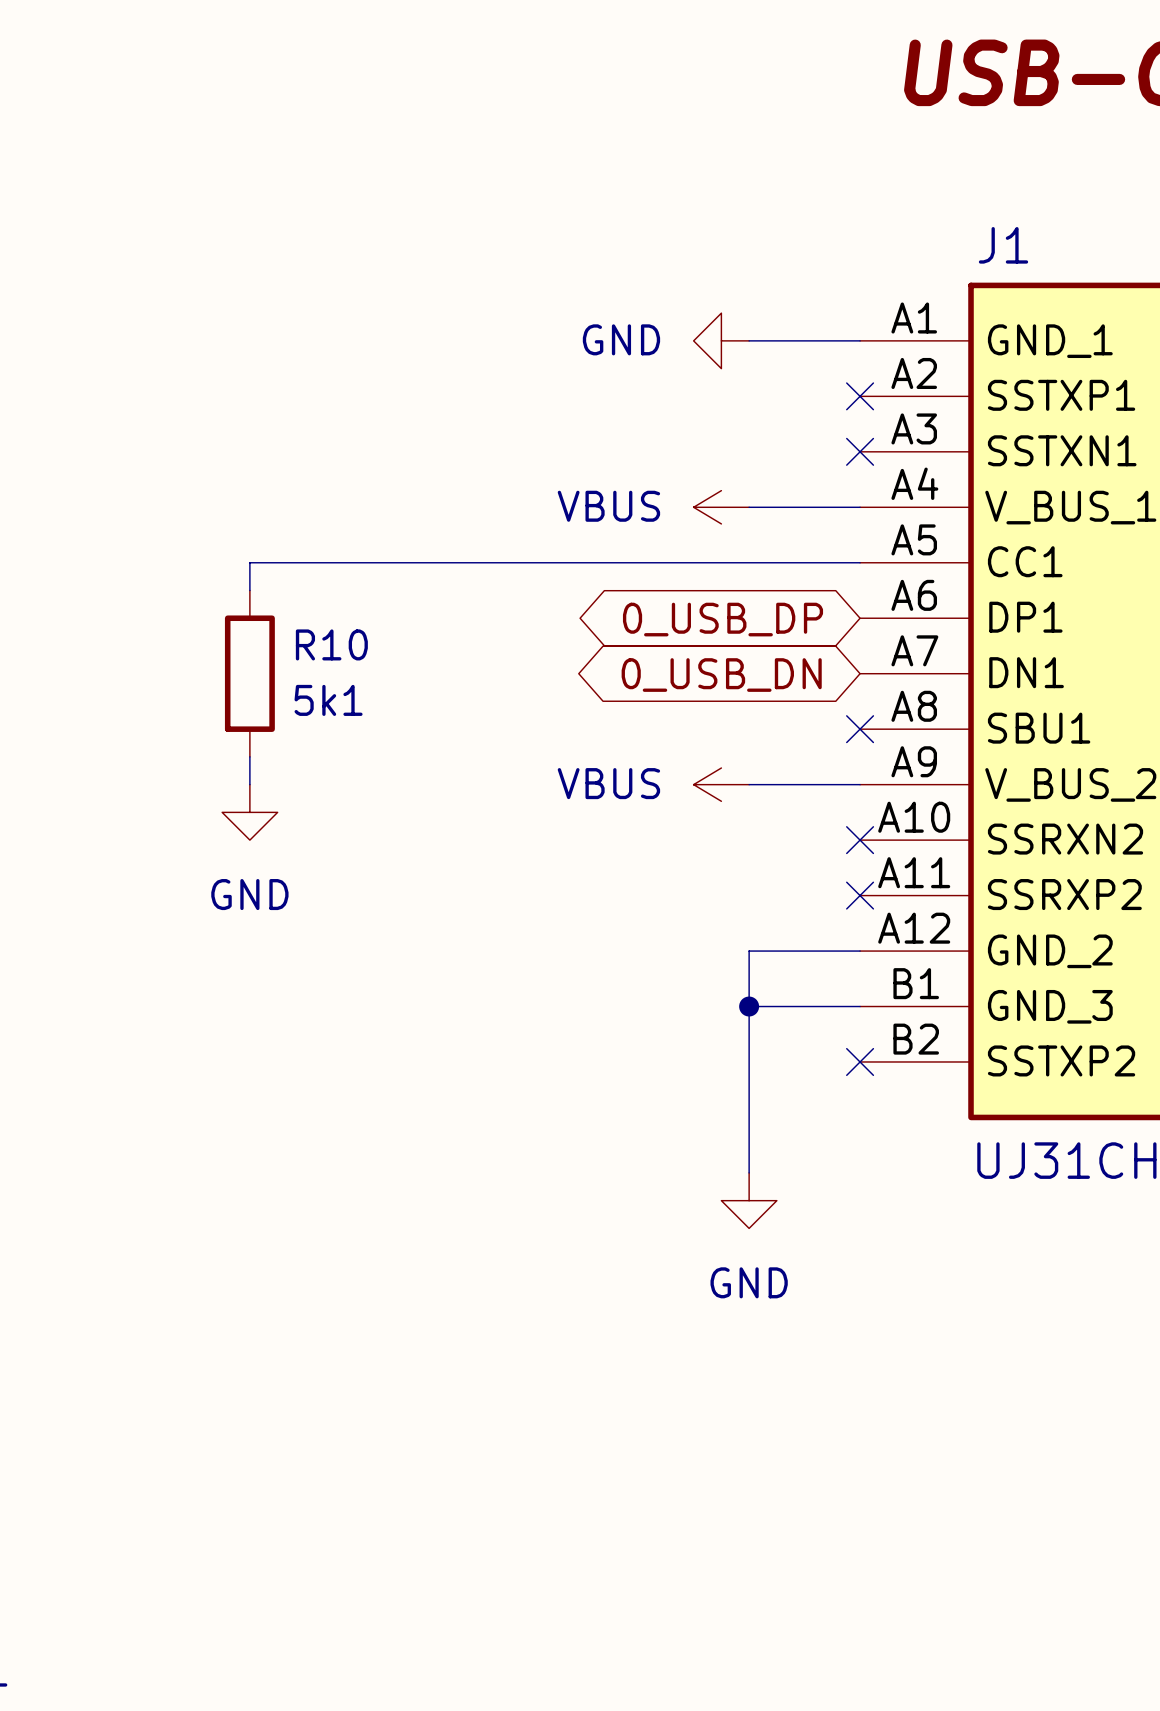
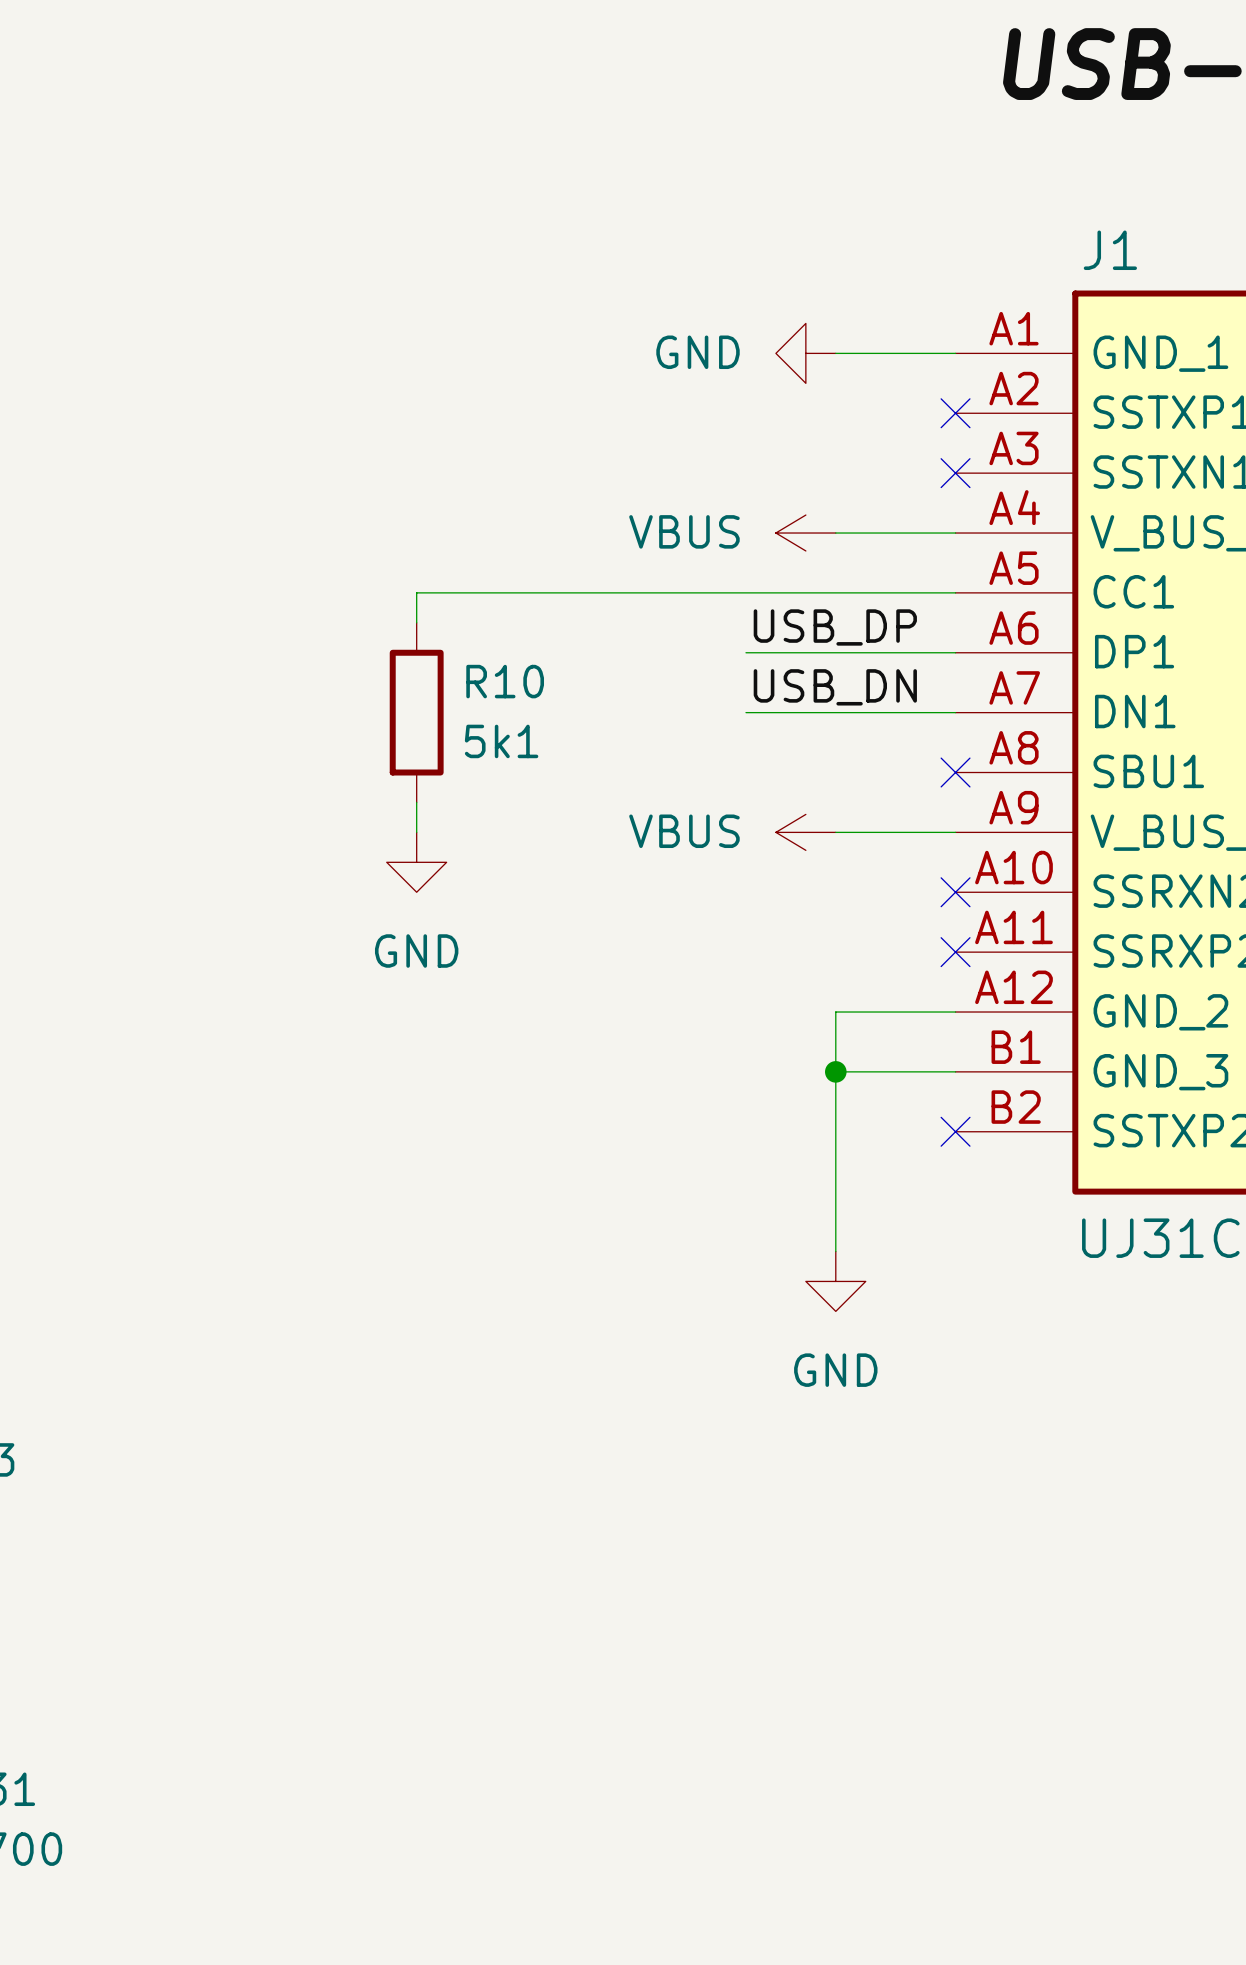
wire: (360, 562) (249, 562) (249, 590) -> (416, 592) (416, 622)
label: none -> USB_DP (835, 627)
wire: none -> (745, 652) (955, 652)
global label: 0_USB_DP (723, 619) -> none
label: none -> USB_DN (835, 687)
R10 position: (249, 673) -> (416, 712)
wire: none -> (745, 712) (955, 712)
global label: 0_USB_DN (721, 675) -> none
wire: (249, 756) (249, 784) -> (416, 802) (416, 832)
power symbol position: GND (249, 812) -> GND (416, 862)

